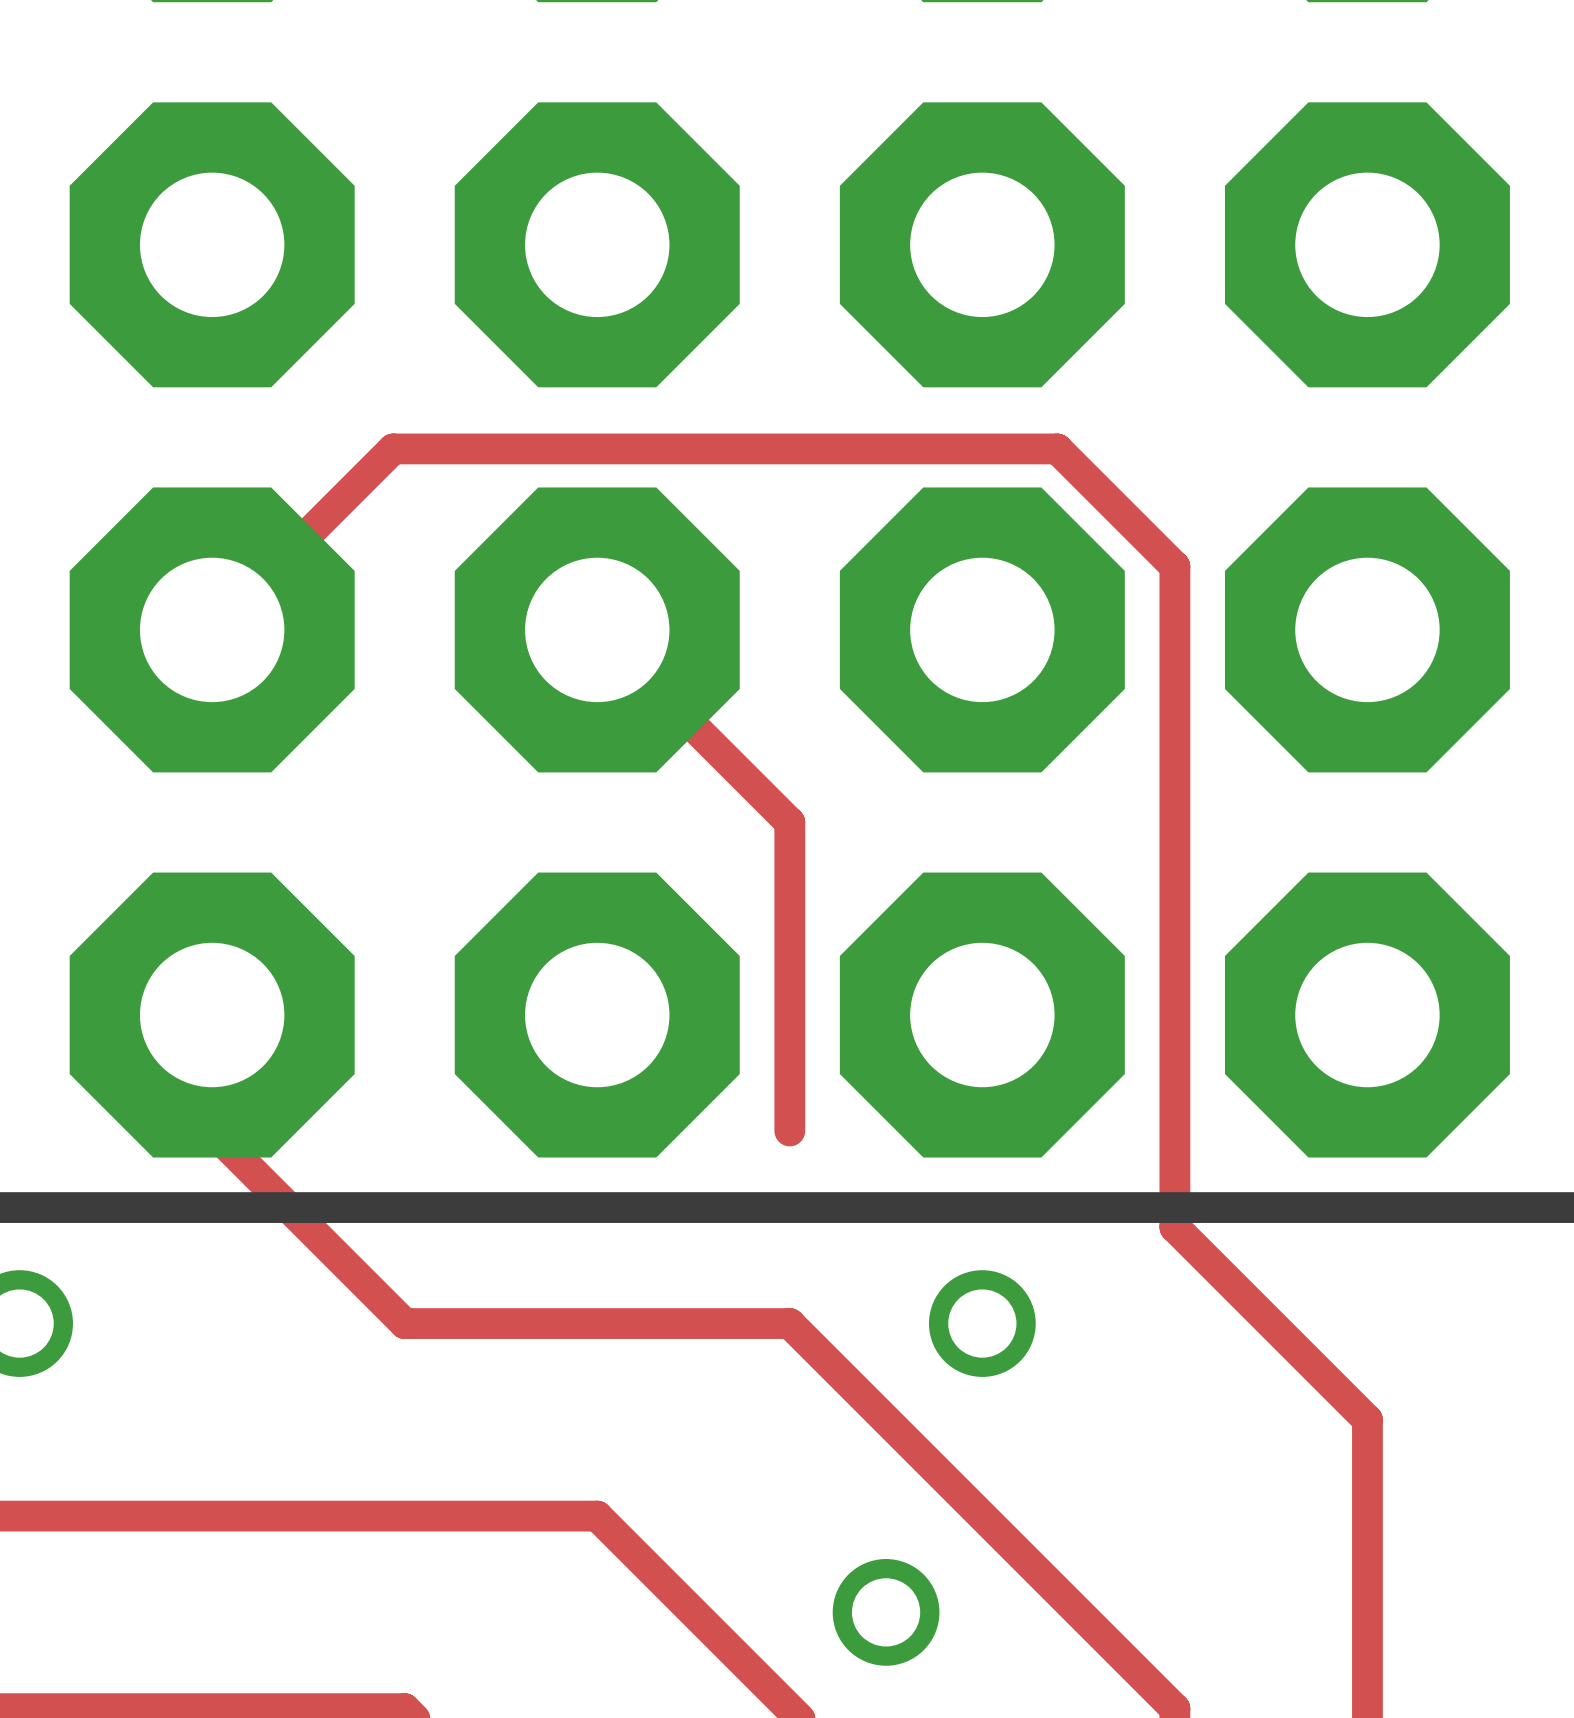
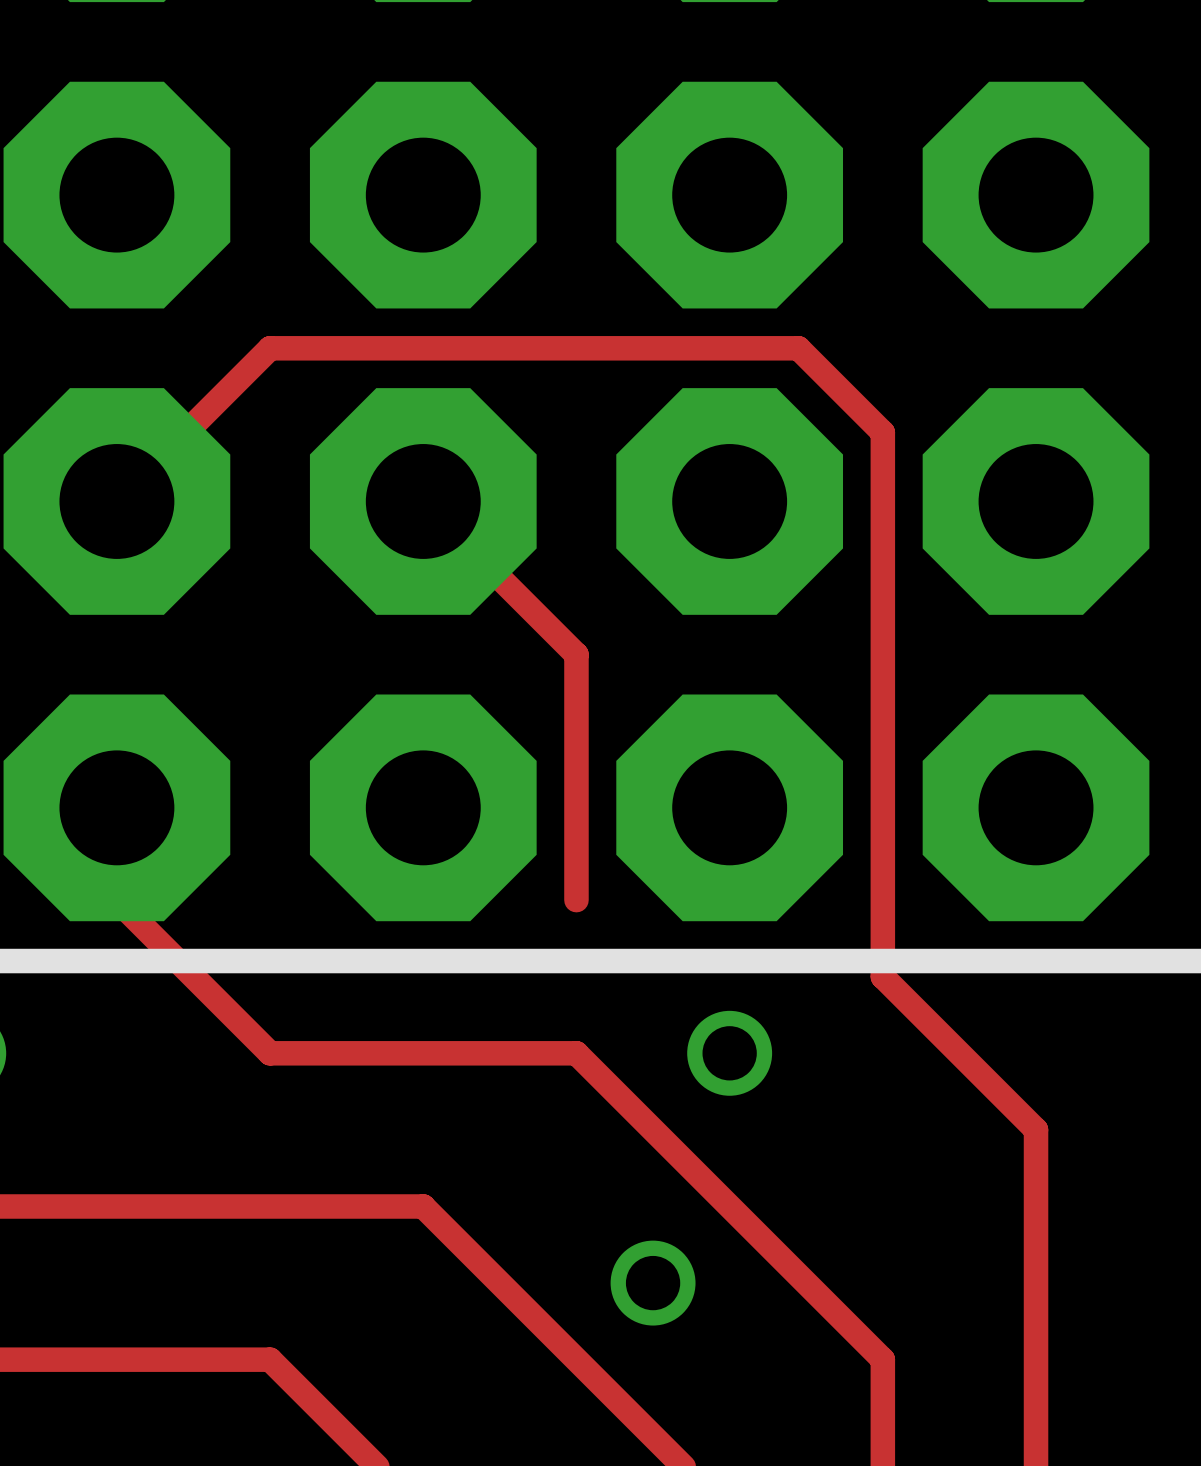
track: (393, 448) (1057, 448) (1174, 566) -> (260, 357) (270, 348) (798, 348) (882, 432) (882, 451)

